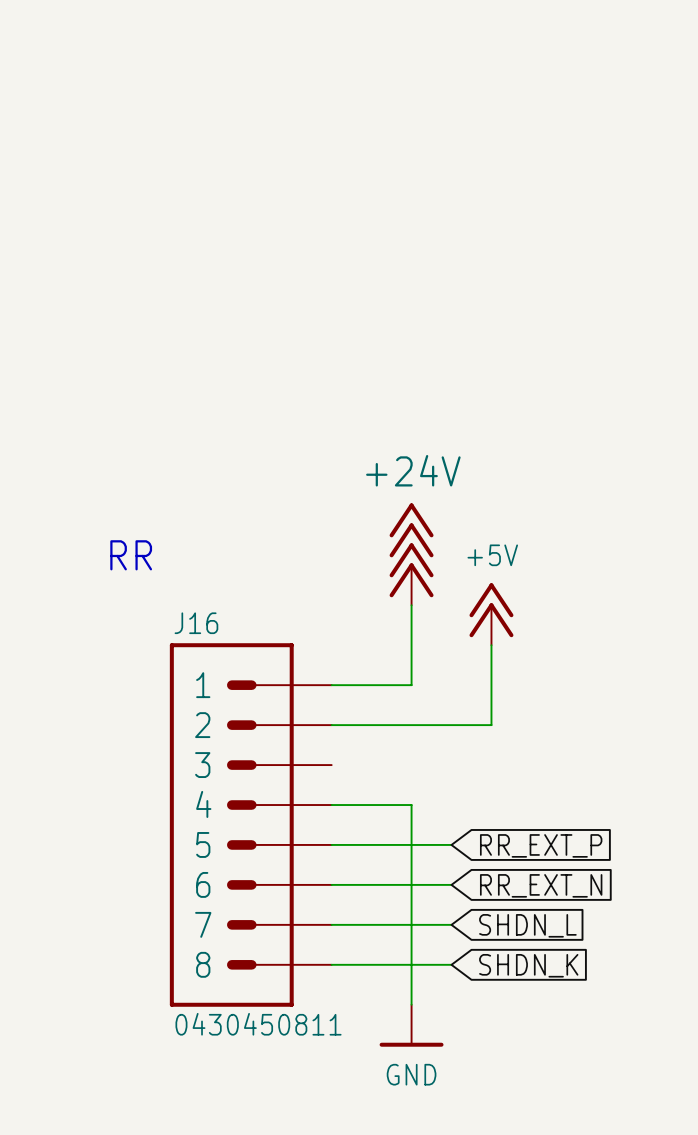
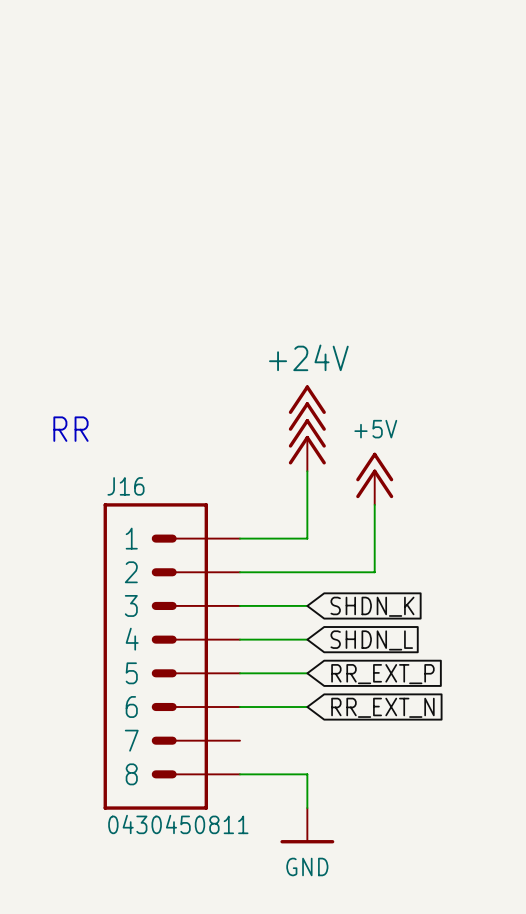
wire: none -> (239, 605) (307, 605)
wire: (411, 805) (411, 964) (451, 964) -> none
wire: (411, 844) (451, 844) -> none
global label position: RR_EXT_P (541, 845) -> RR_EXT_P (382, 674)
wire: (411, 884) (451, 884) -> none
global label position: RR_EXT_N (541, 885) -> RR_EXT_N (382, 707)
wire: (331, 924) (451, 924) -> none
global label position: SHDN_L (527, 925) -> SHDN_L (371, 640)
global label position: SHDN_K (528, 965) -> SHDN_K (372, 606)

